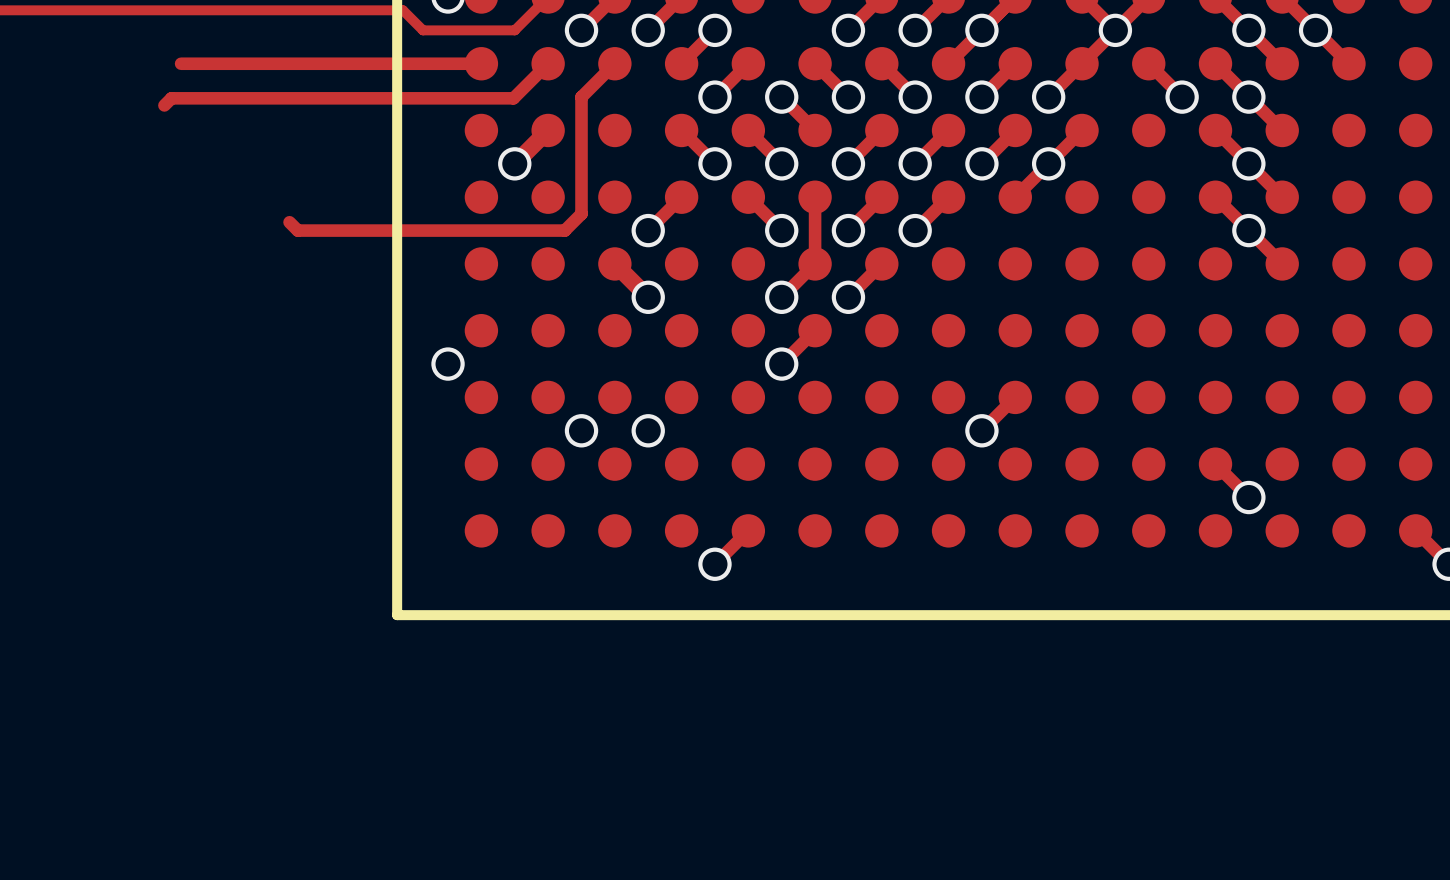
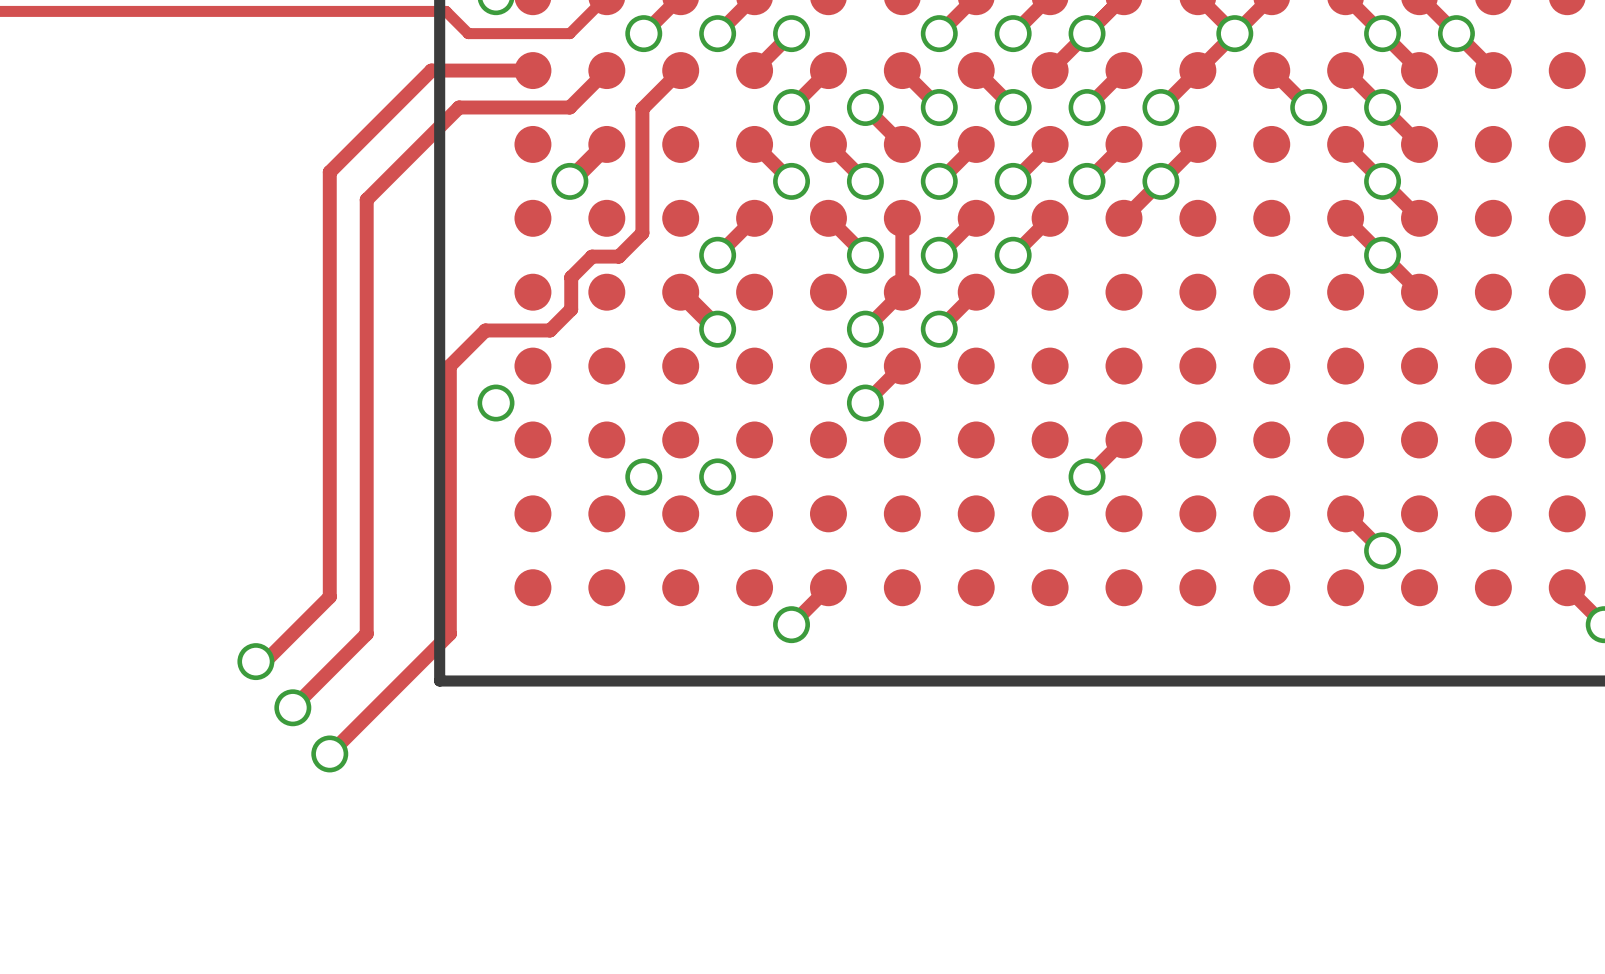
track: (181, 63) (389, 63) -> (255, 661) (265, 661) (329, 596) (329, 172) (431, 70)
track: (514, 97) (171, 98) (164, 105) -> (569, 107) (459, 107) (366, 199) (366, 633) (292, 707)
track: (581, 97) (581, 213) (564, 230) (297, 230) (289, 222) -> (643, 107) (642, 233) (618, 256) (592, 256) (571, 277) (571, 309) (550, 330) (485, 330) (449, 366) (449, 633) (329, 753)
via: none -> (255, 661)
via: none -> (292, 707)
via: none -> (329, 753)

